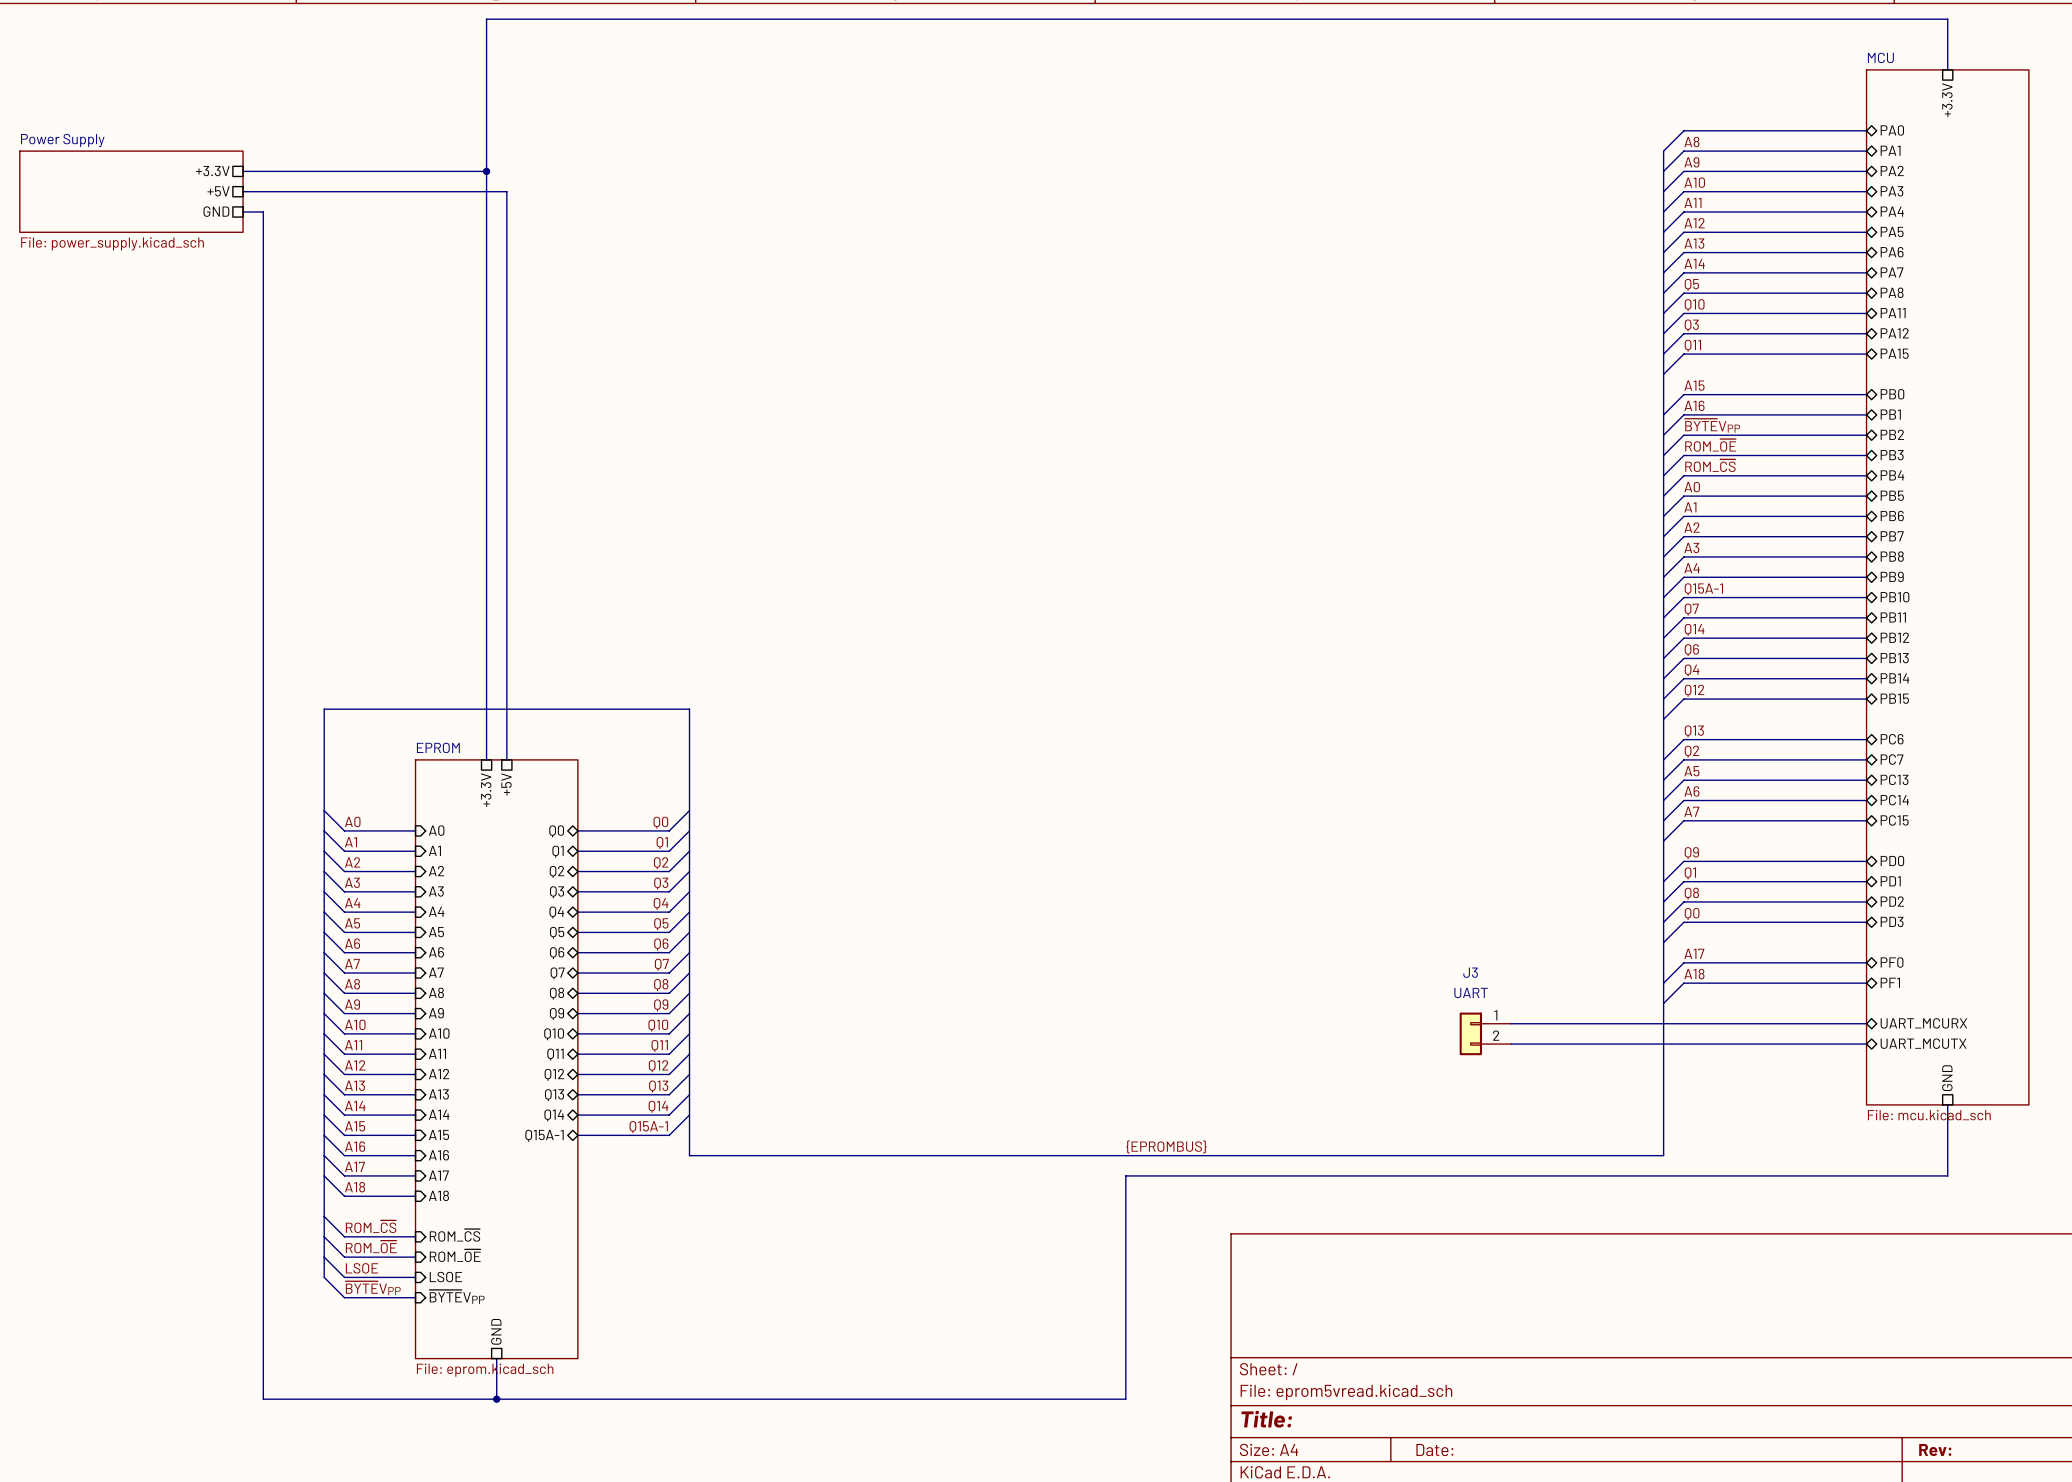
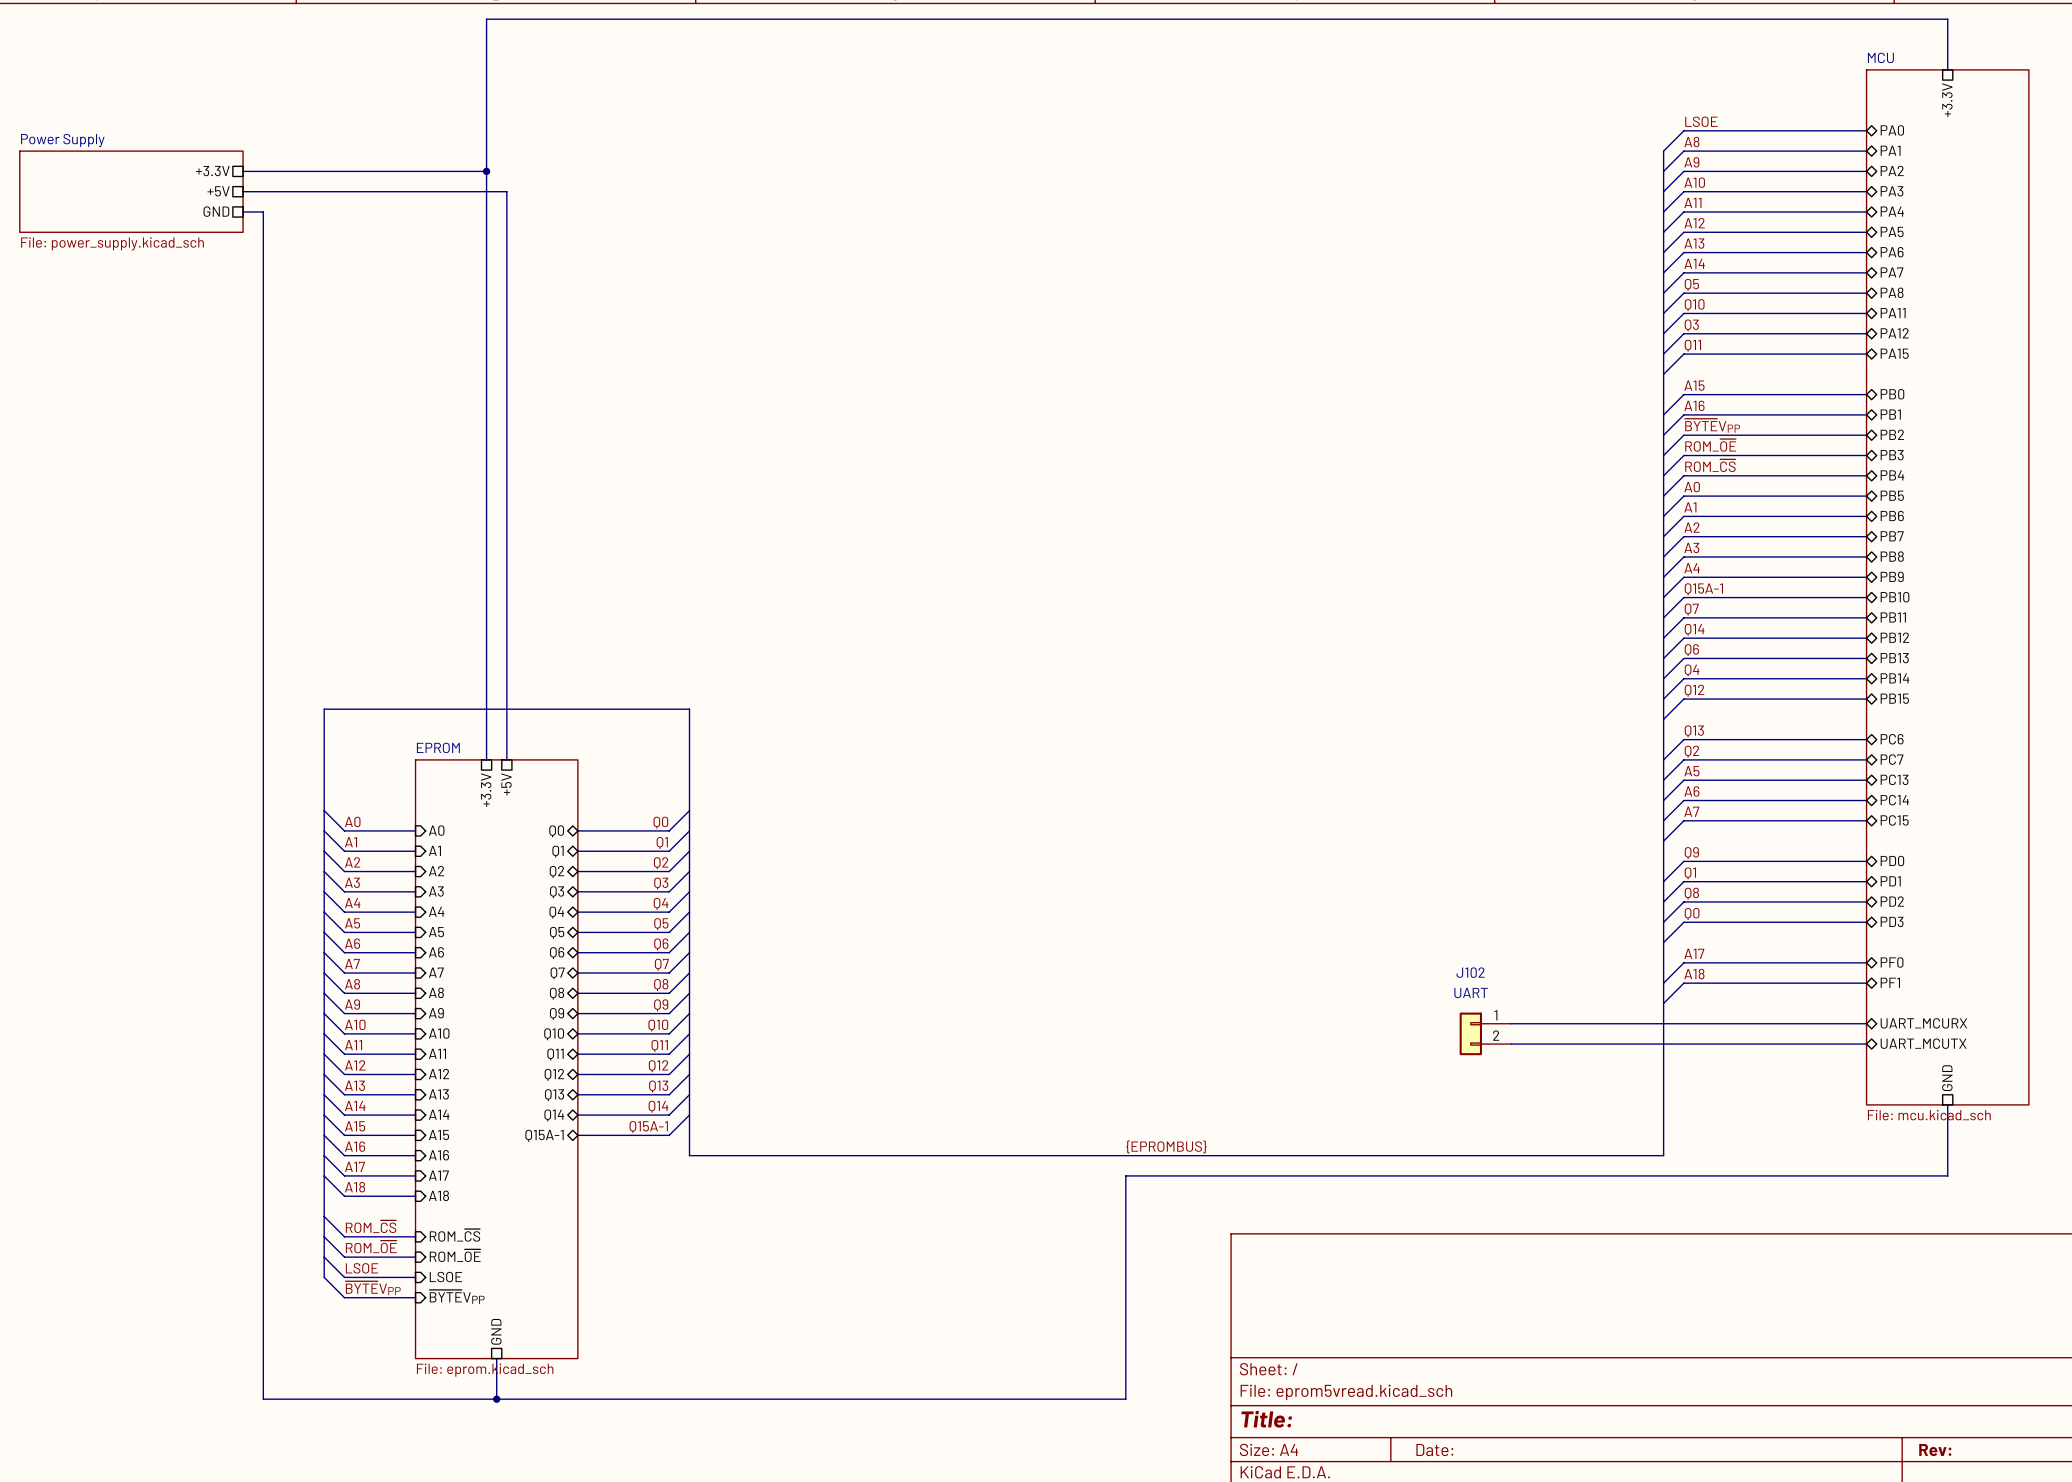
label: none -> LSOE (1701, 121)
J3 name: J3 (1470, 972) -> J102 (1470, 972)

